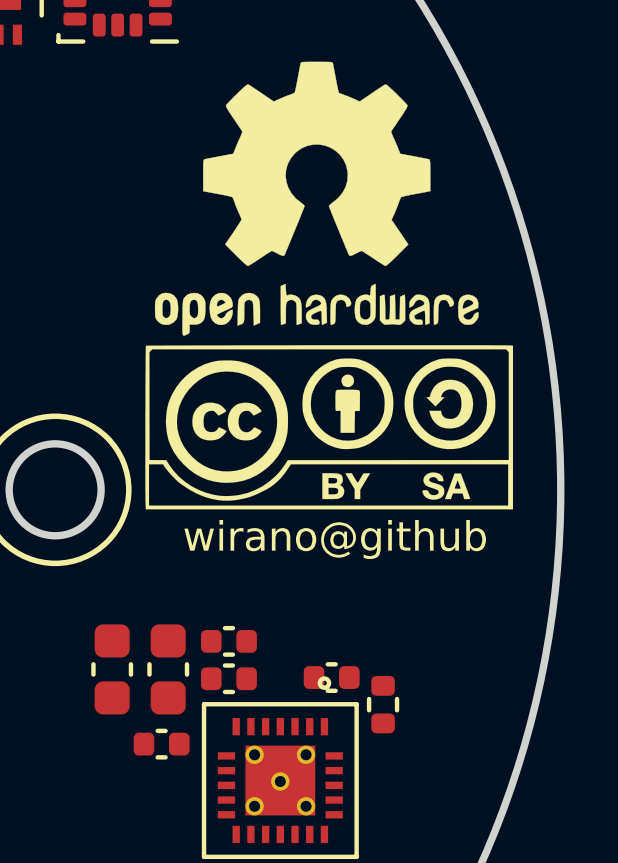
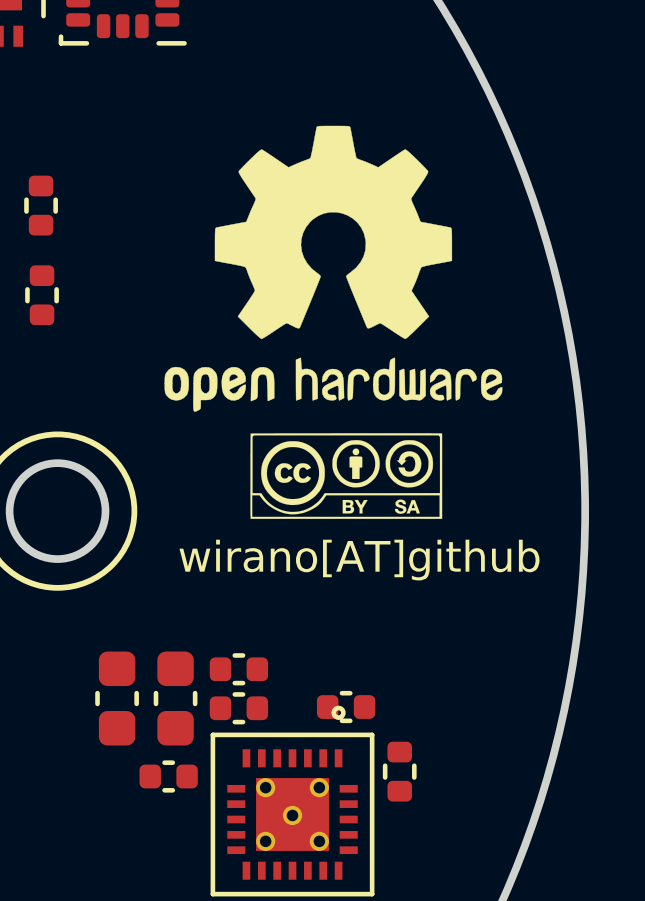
part: none -> (41, 205)
drawing position: (316, 198) -> (333, 268)
part: none -> (42, 295)
drawing shape: [145, 345, 514, 510] -> [250, 433, 443, 519]
text: wirano@github (335, 539) -> wirano[AT]github (359, 560)
part position: (383, 704) -> (399, 771)

